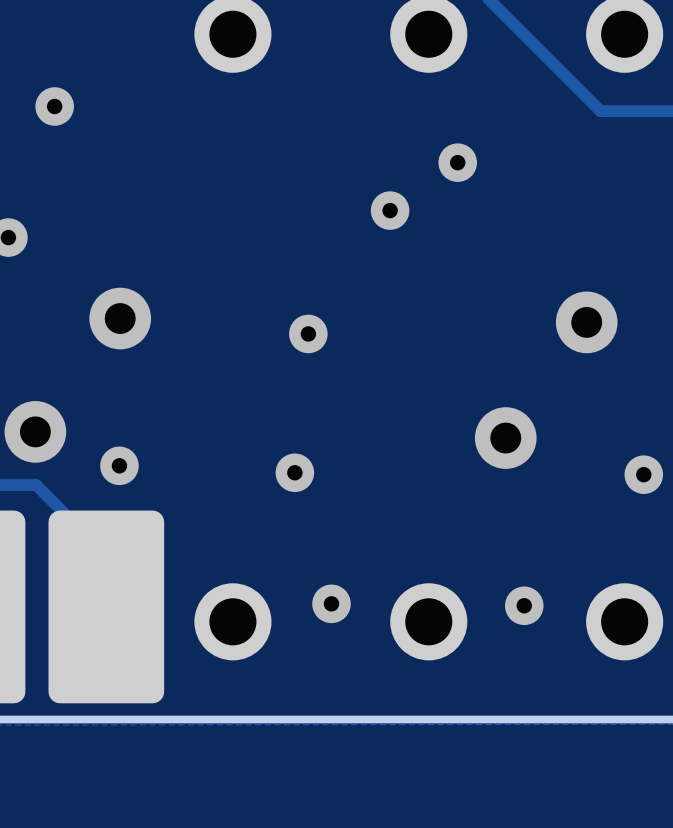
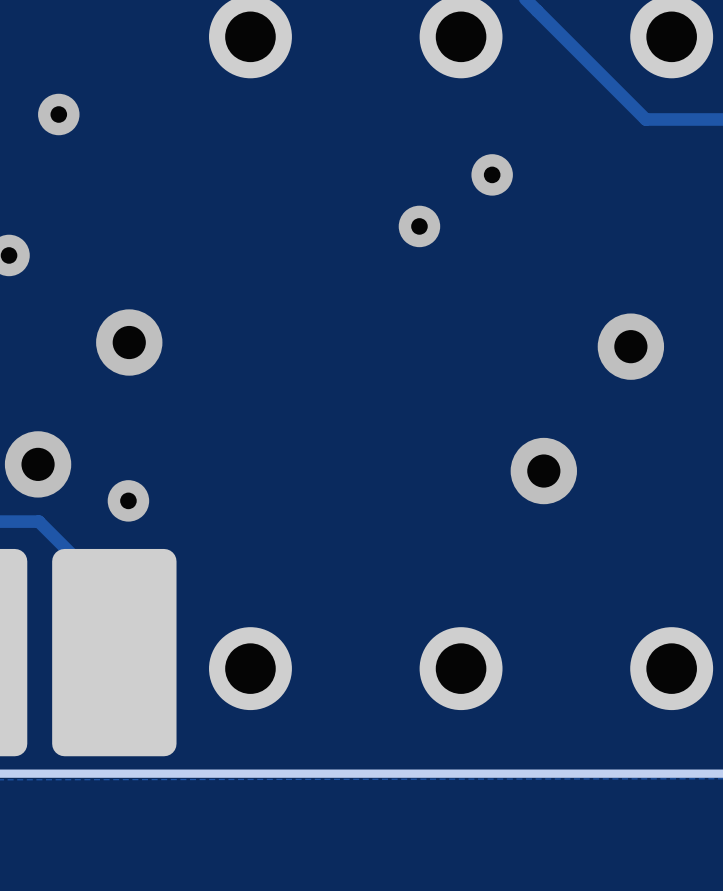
via: (308, 333) -> none
via: (294, 472) -> none
via: (643, 474) -> none
via: (331, 603) -> none
via: (524, 605) -> none

